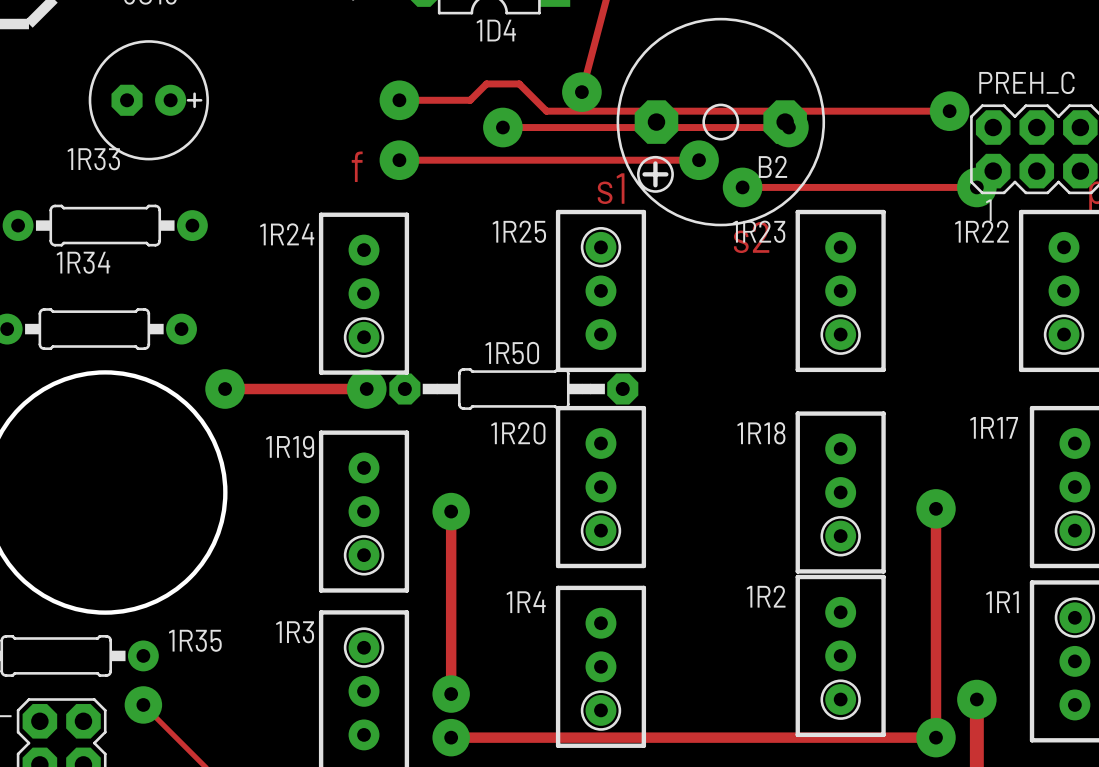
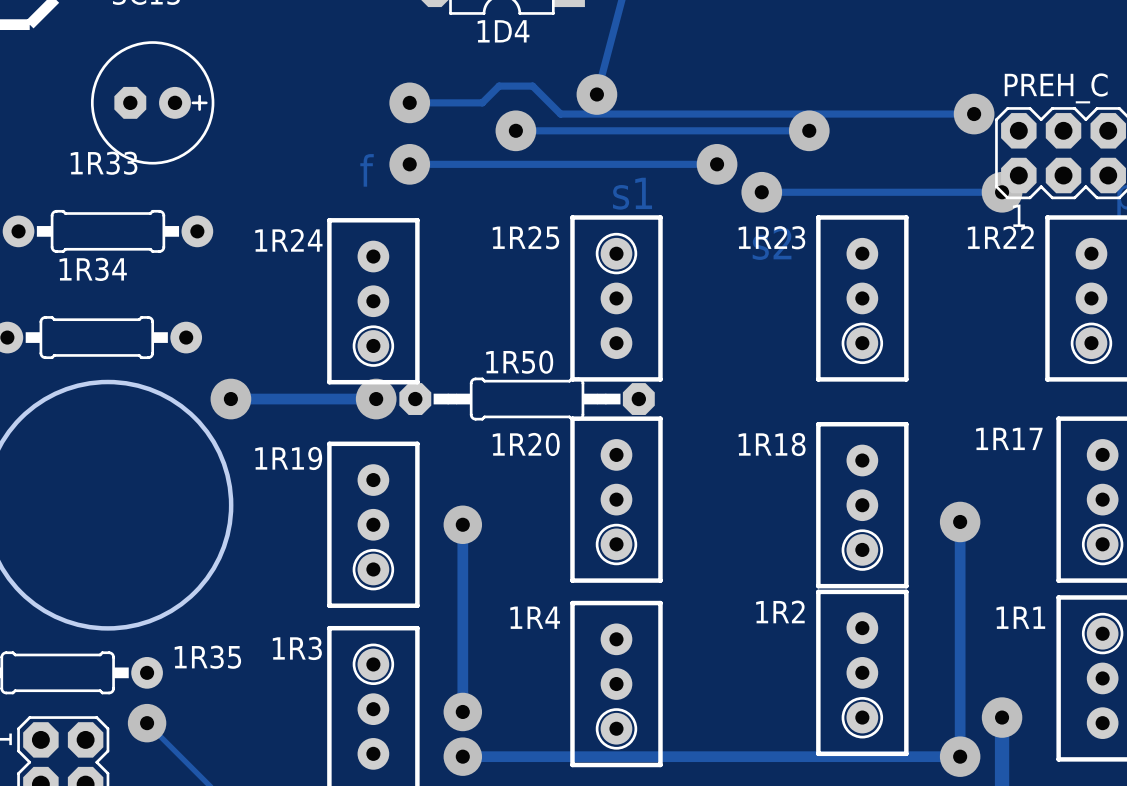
B2: (720, 122) -> none

